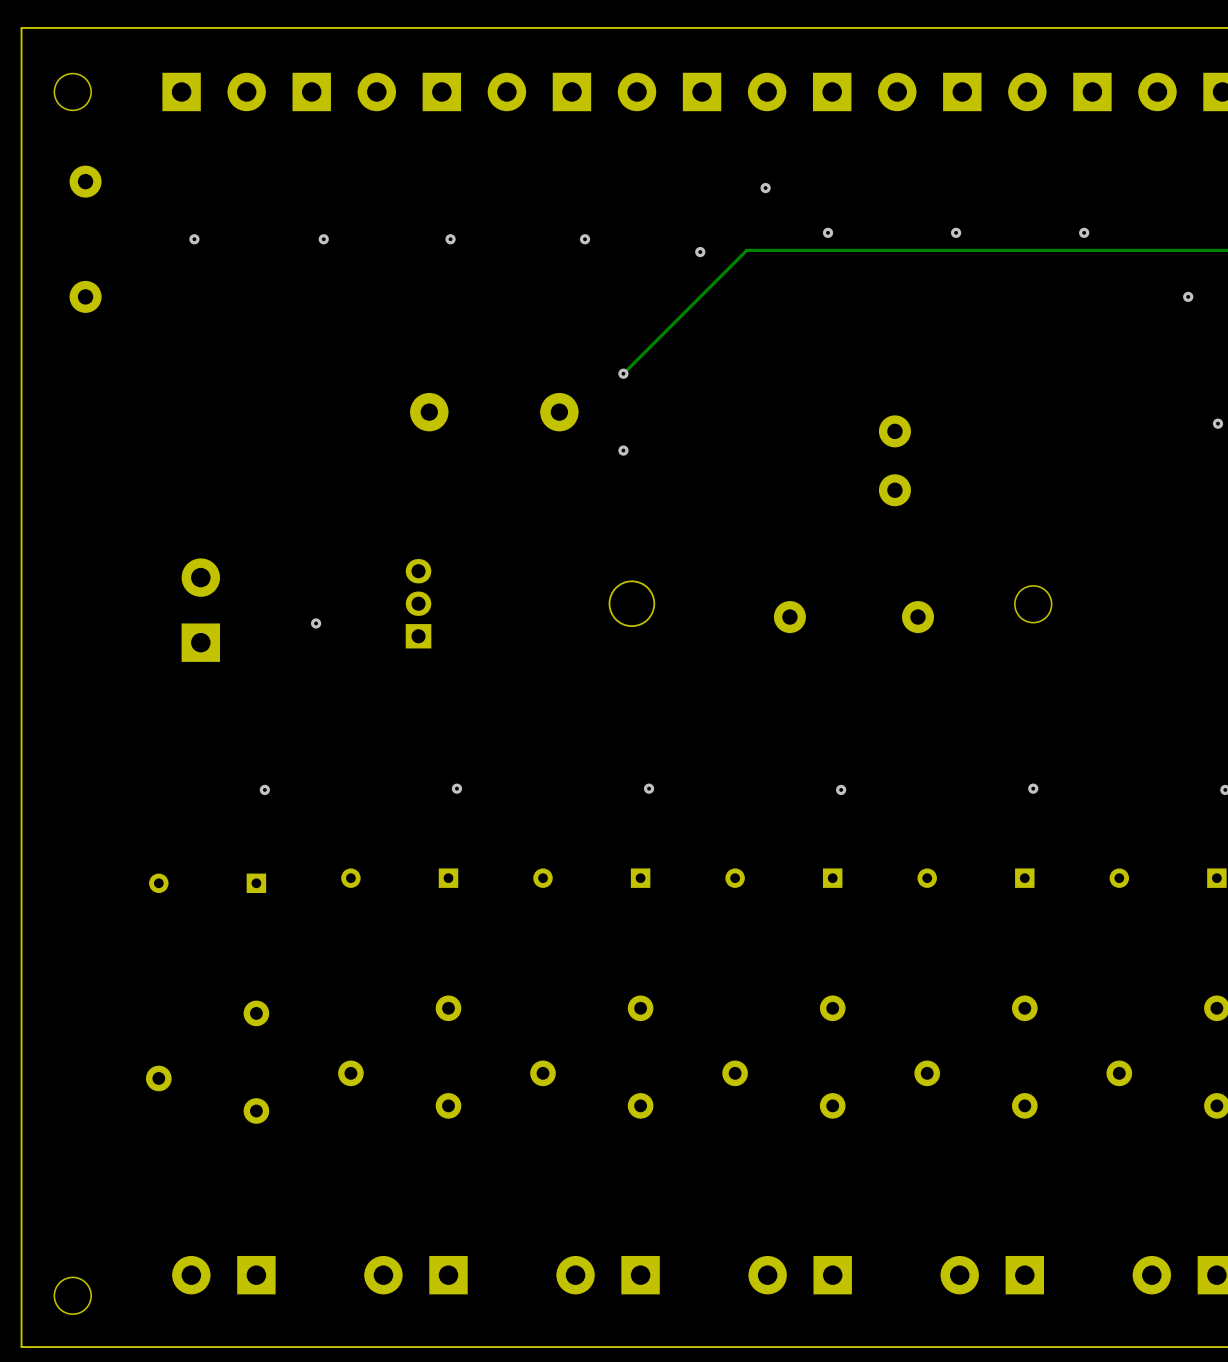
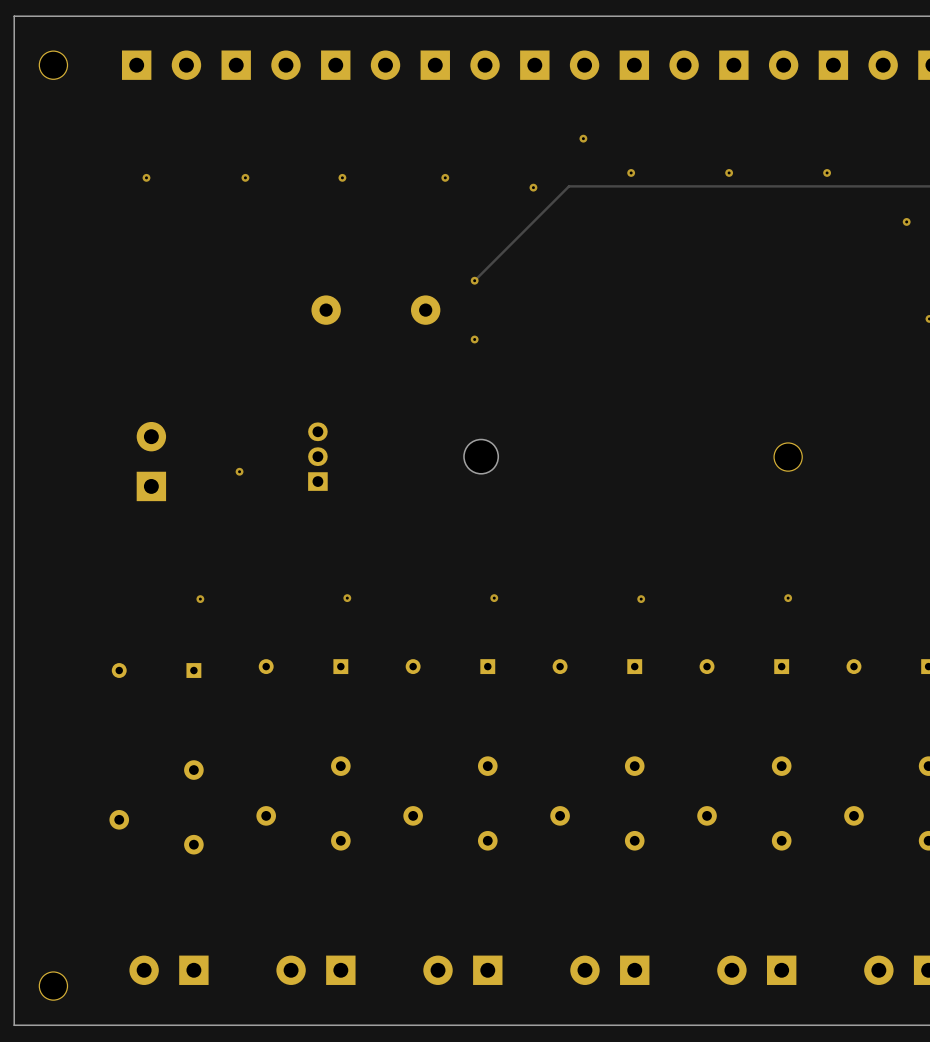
part: (85, 181) -> none
part: (85, 296) -> none
part: (894, 431) -> none
part: (894, 490) -> none
part: (789, 617) -> none
part: (917, 617) -> none

